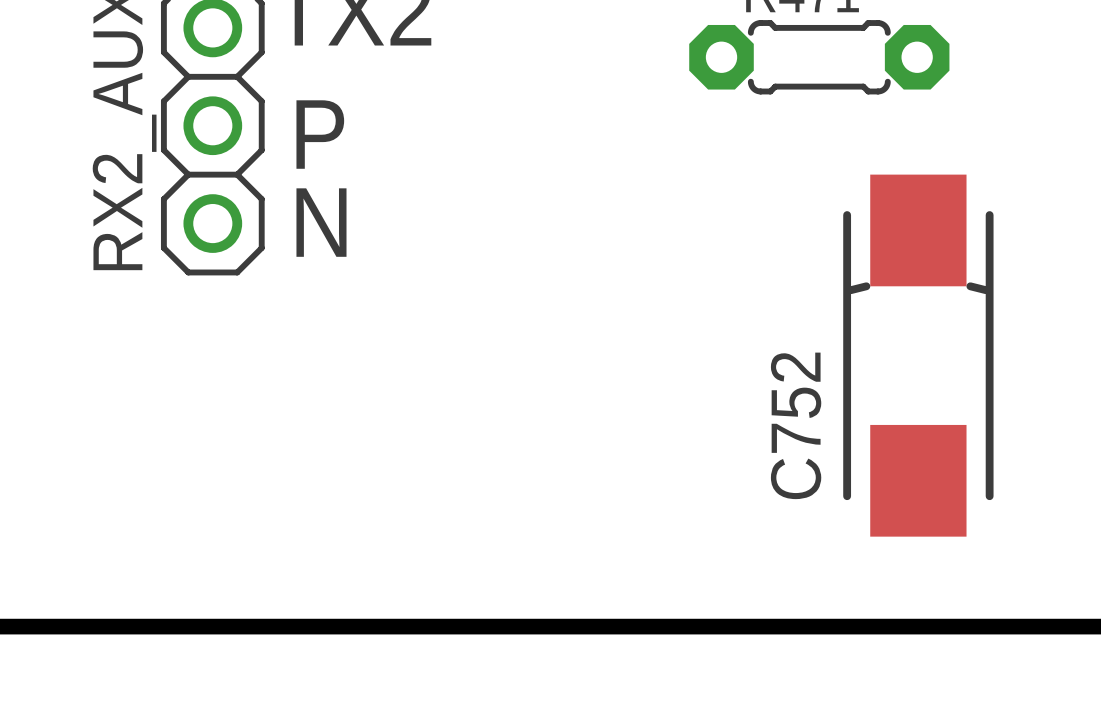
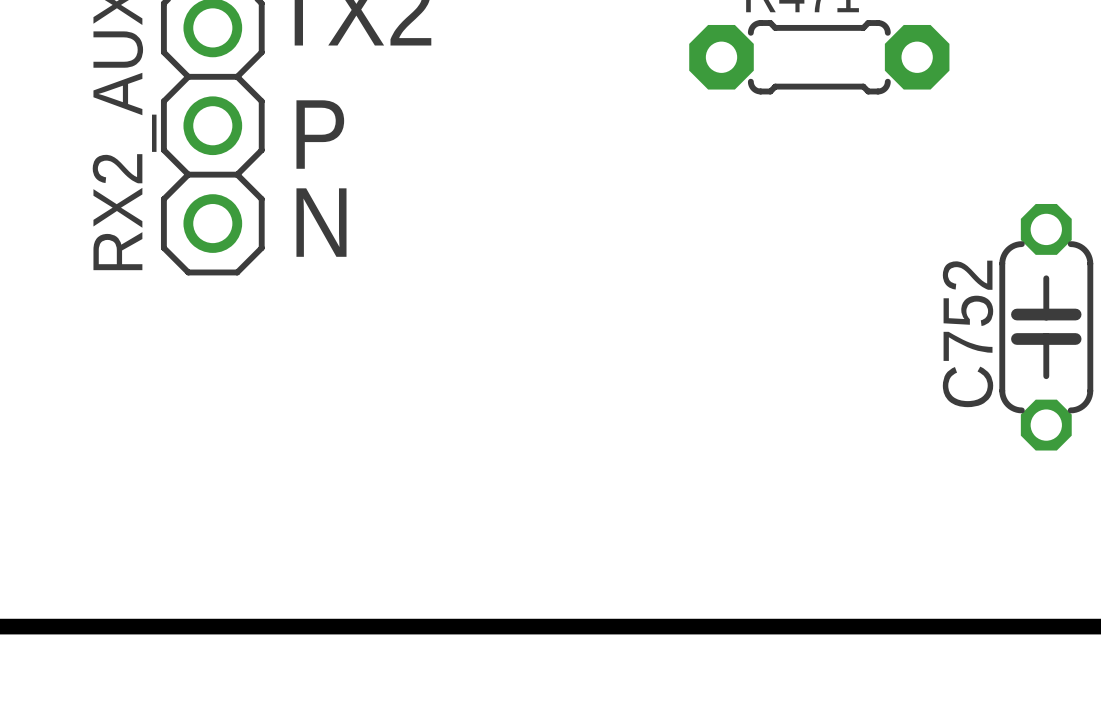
C752 footprint: [843, 174, 994, 537] -> [999, 203, 1094, 451]
C752 name position: C752 (796, 425) -> C752 (968, 333)

